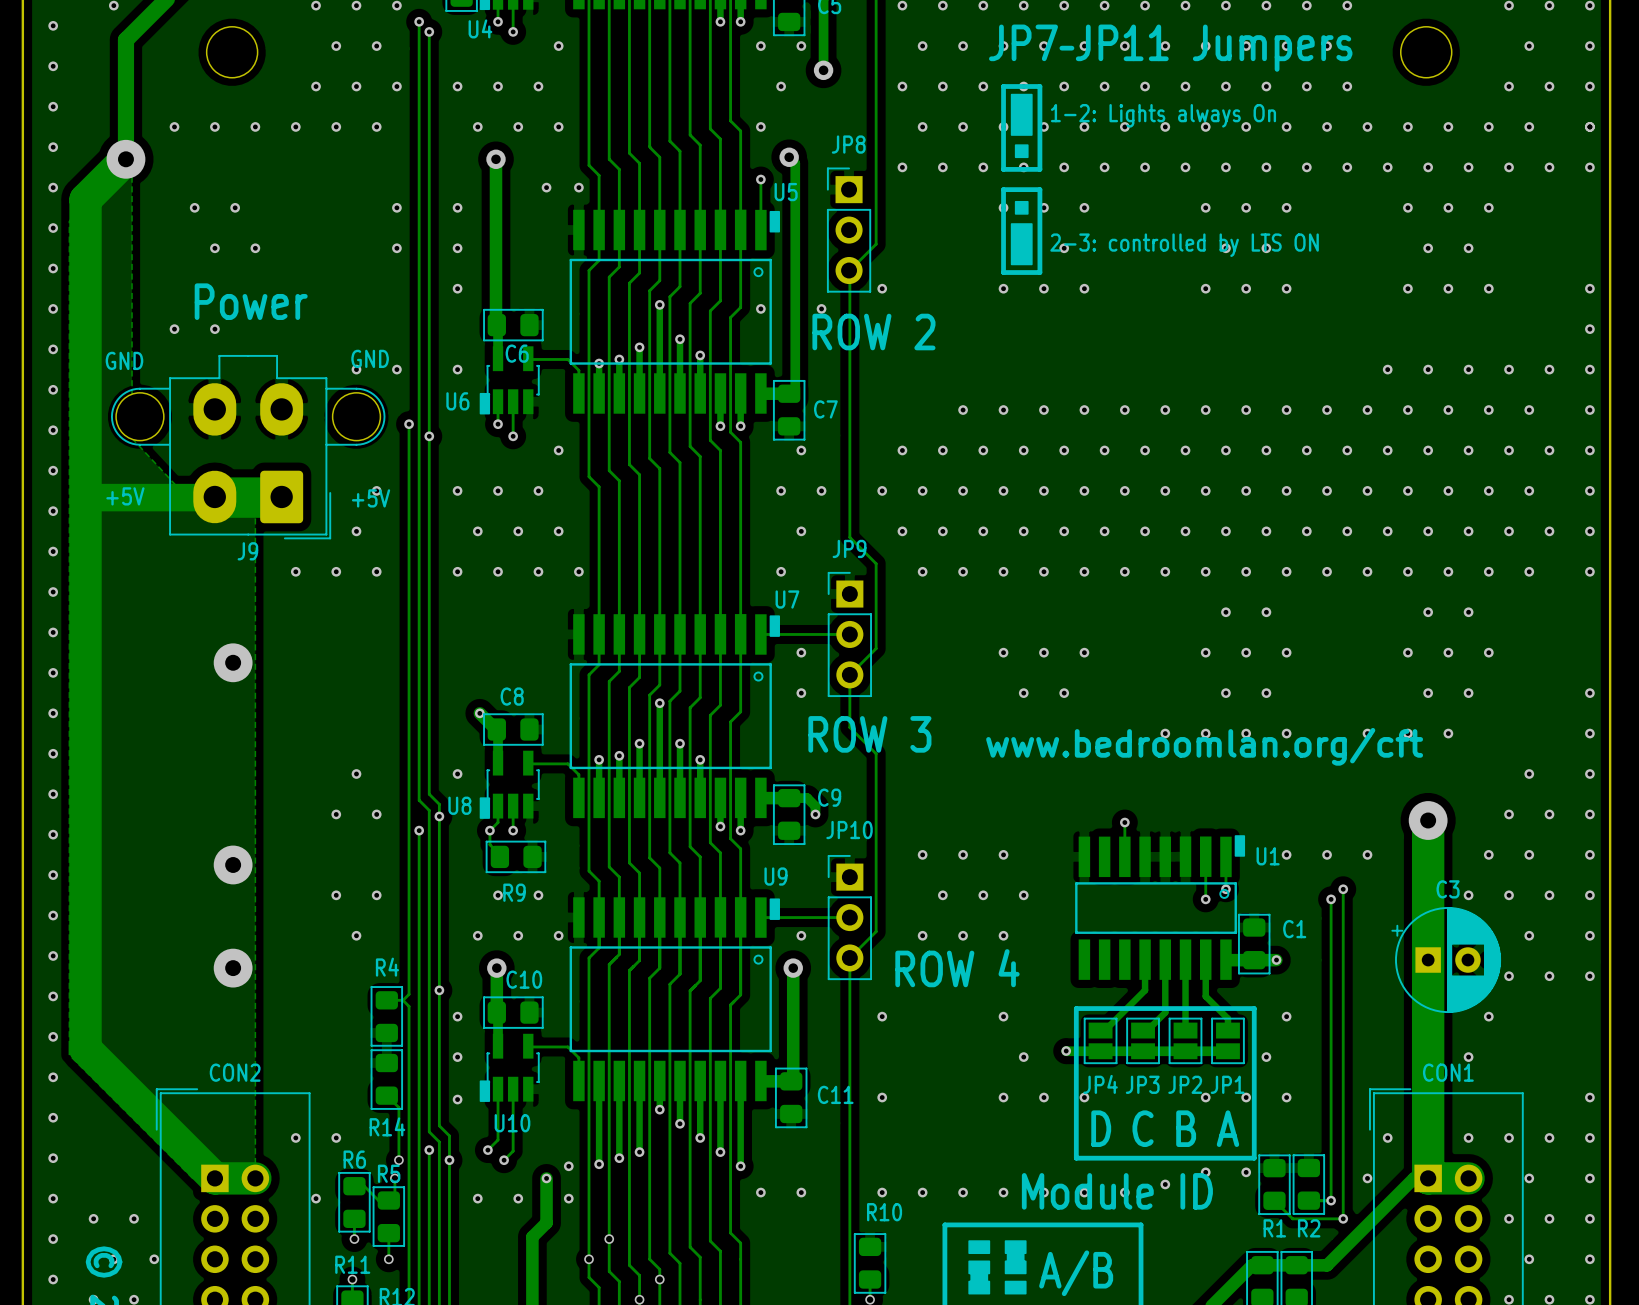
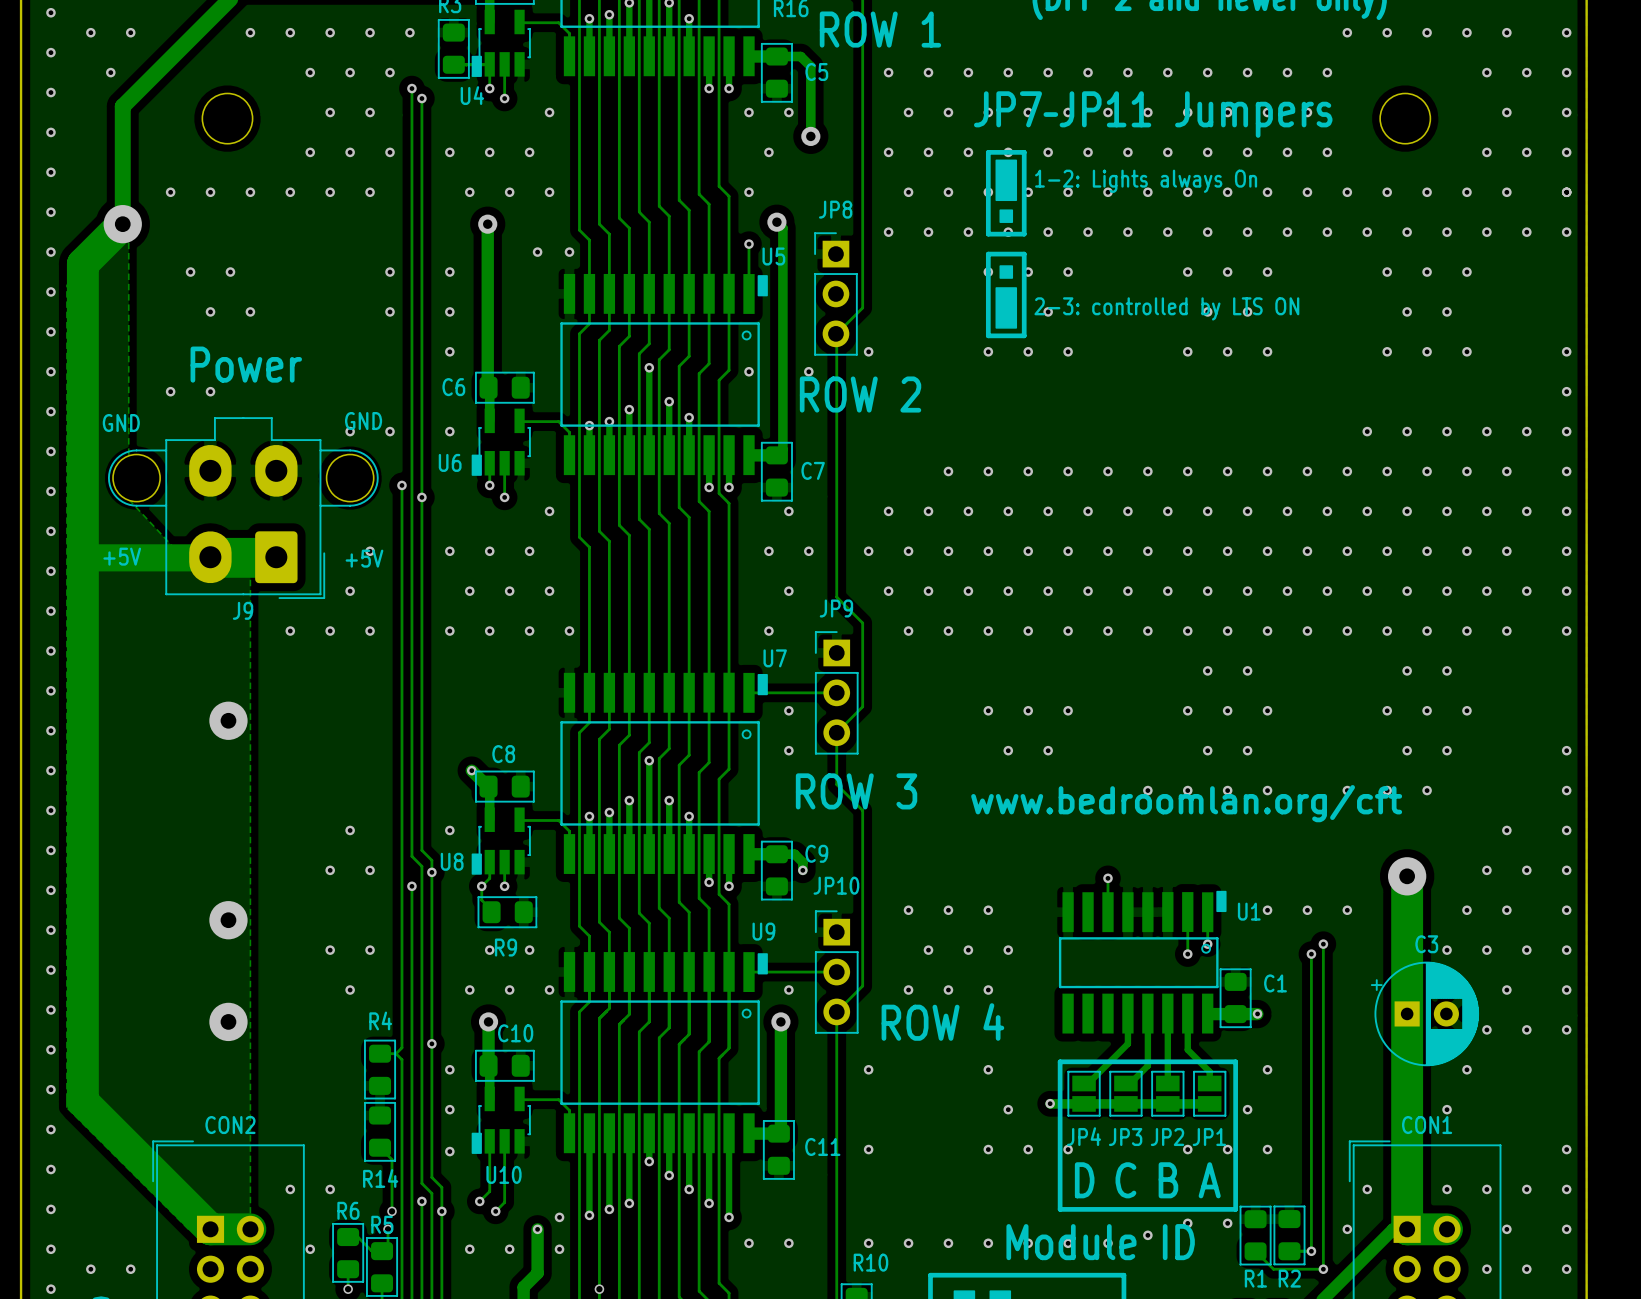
C6 name position: C6 (517, 353) -> C6 (453, 387)

